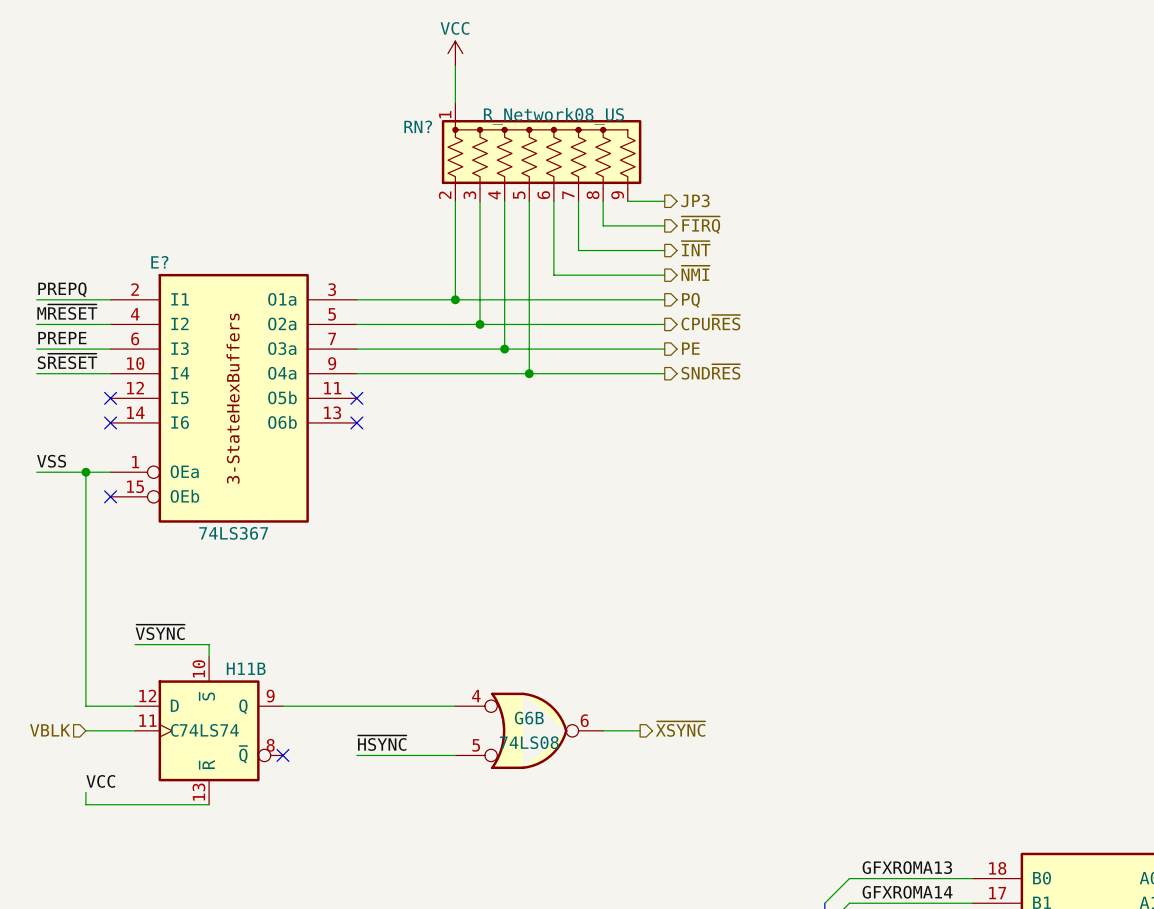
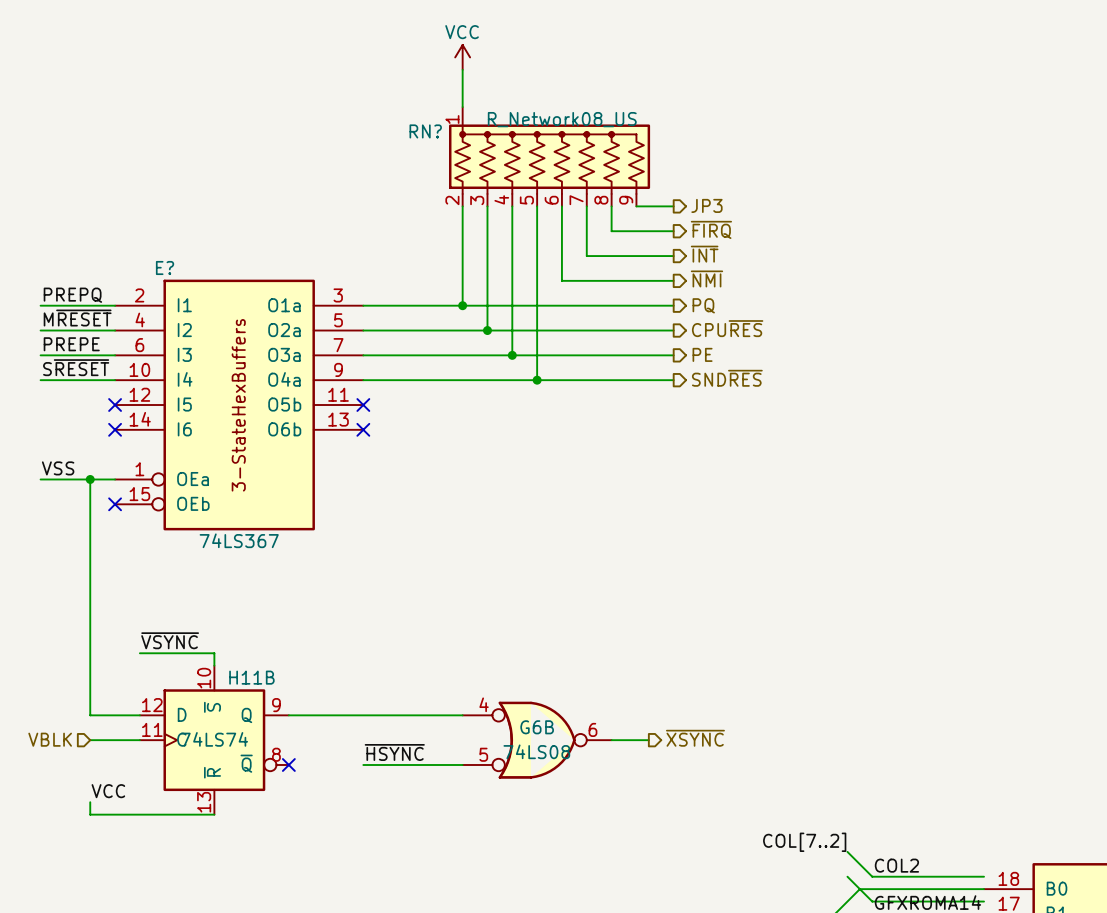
label: none -> COL[7..2] (804, 842)
wire: none -> (847, 851) (872, 876) (984, 876)
label: none -> COL2 (896, 865)
wire: none -> (847, 876) (872, 901) (984, 901)
label: GFXROMA13 (907, 867) -> none

